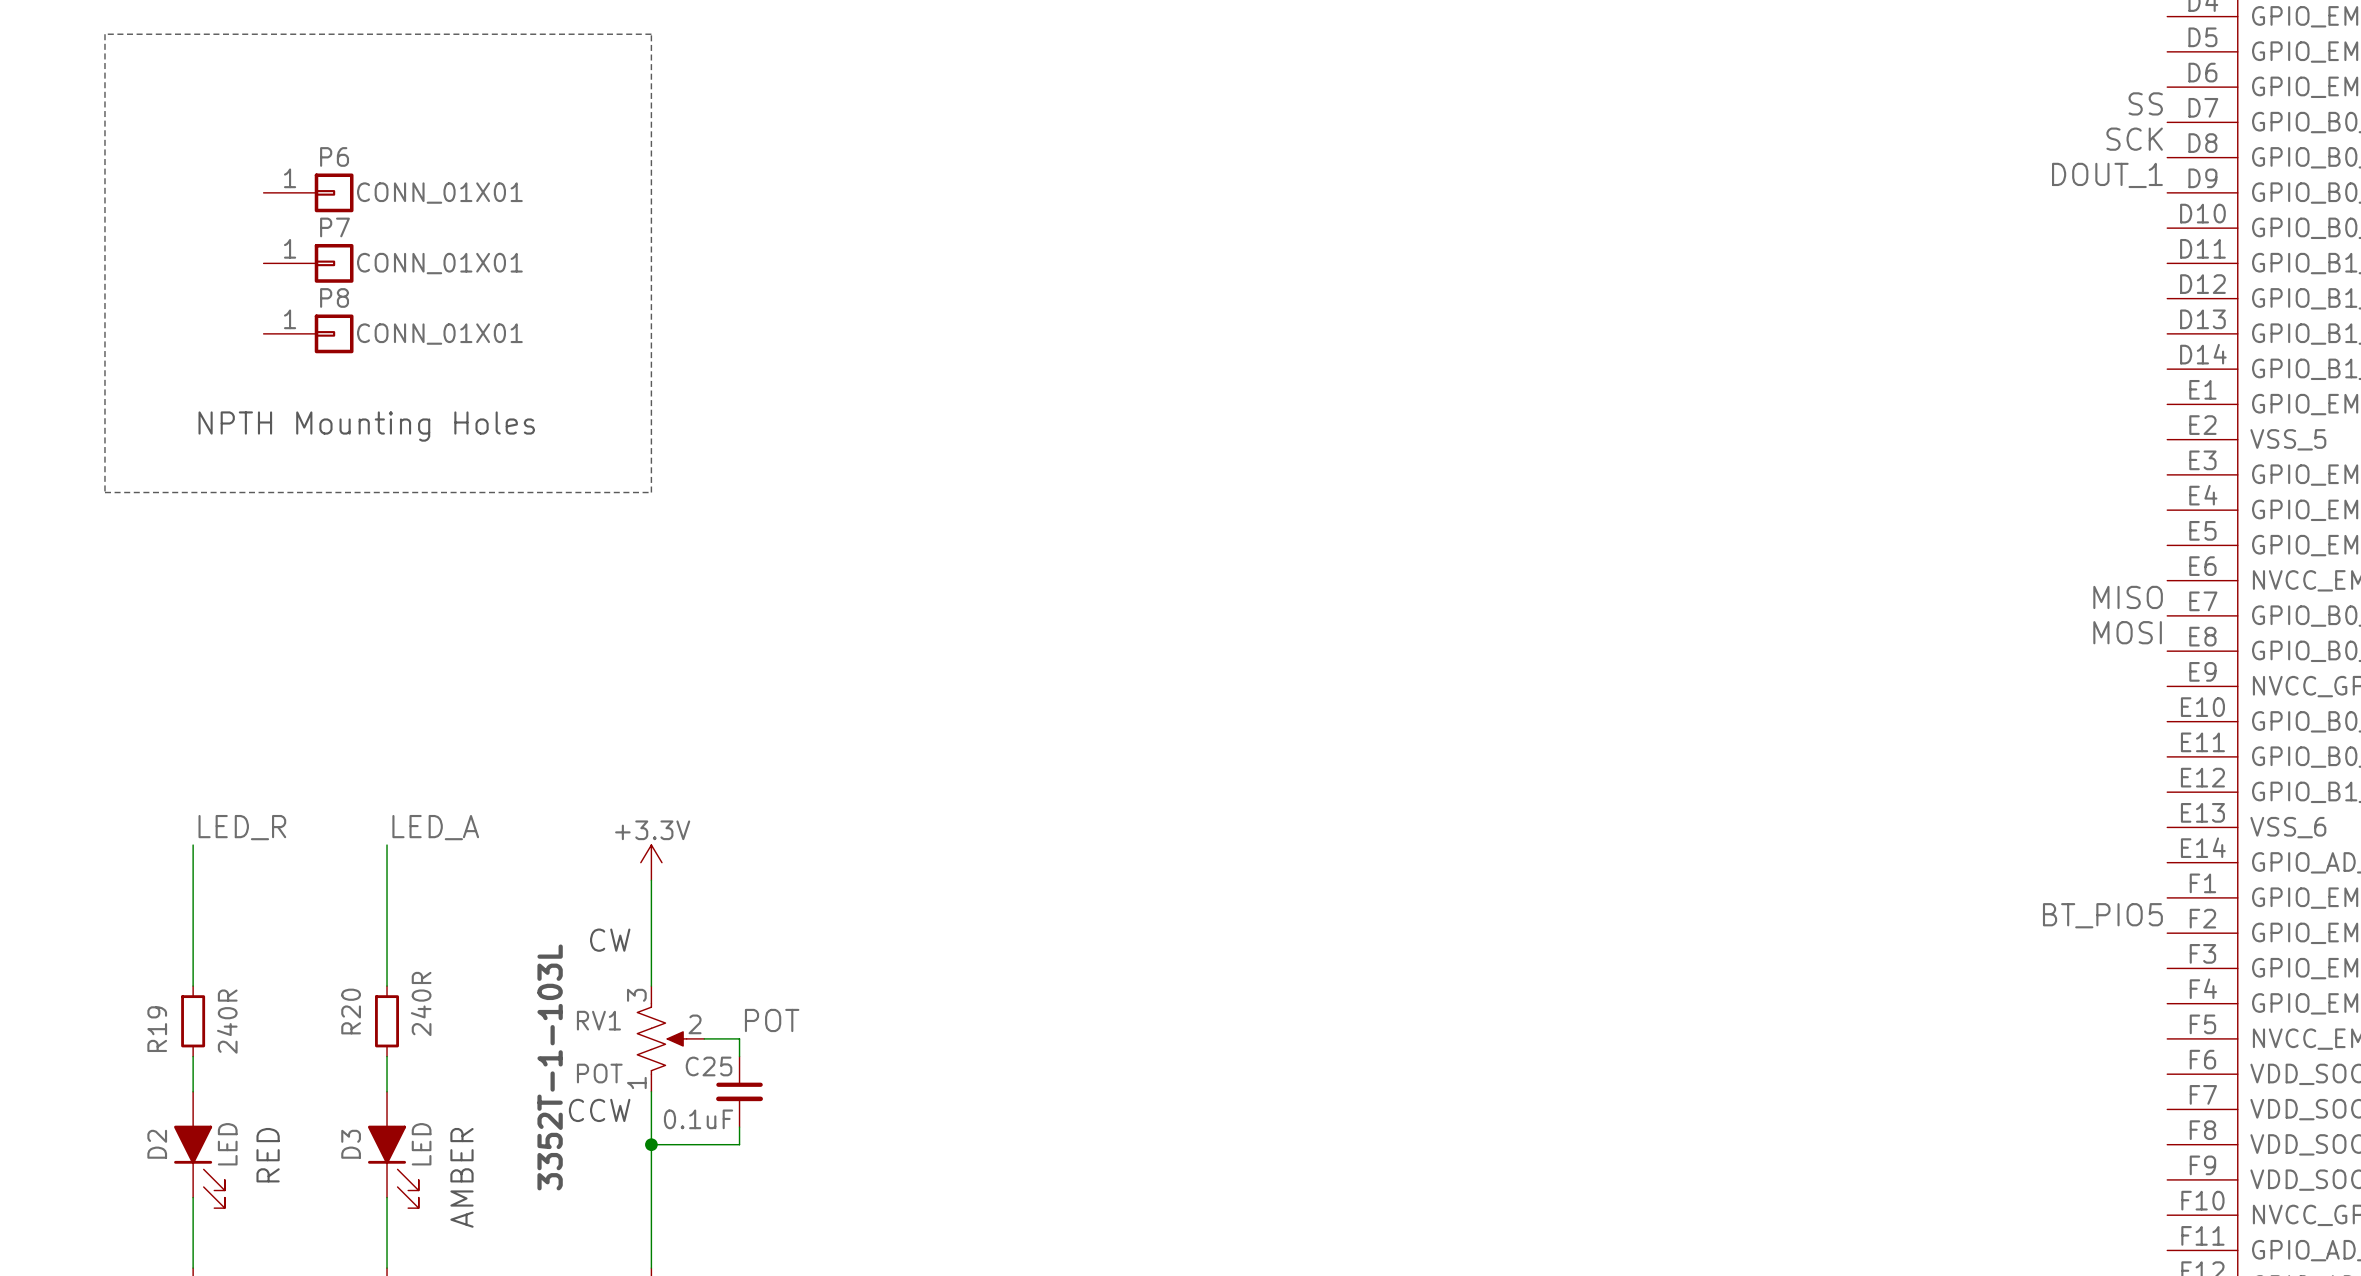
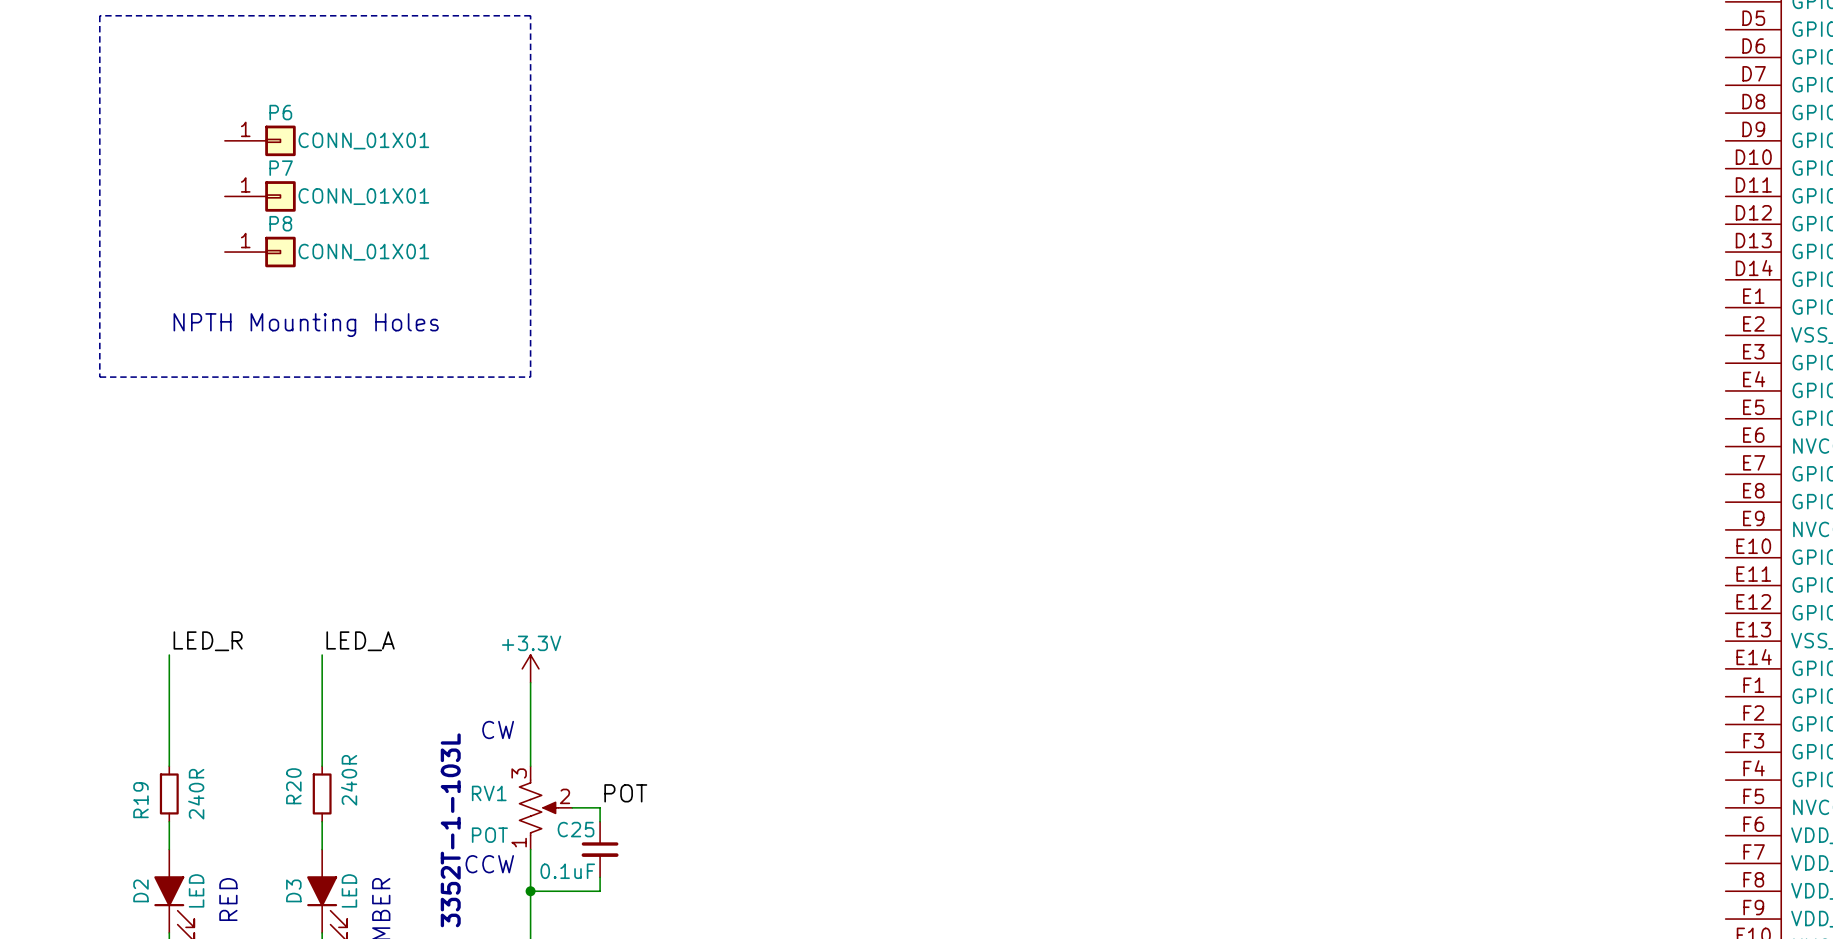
label: SS (2145, 103) -> none
label: SCK (2134, 139) -> none
label: DOUT_1 (2107, 175) -> none
label: MISO (2128, 597) -> none
label: MOSI (2127, 632) -> none
label: BT_PIO5 (2102, 915) -> none

